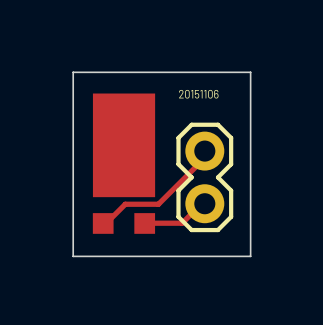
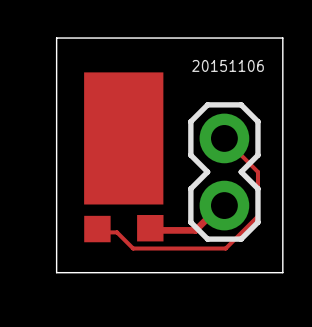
part footprint: [92, 93, 156, 234] -> [84, 72, 164, 243]
top track: (204, 151) (201, 152) (201, 161) (158, 204) (125, 204) (106, 223) (103, 223) -> (224, 138) (257, 172) (257, 216) (225, 248) (133, 248) (117, 232) (100, 232) (97, 229)

